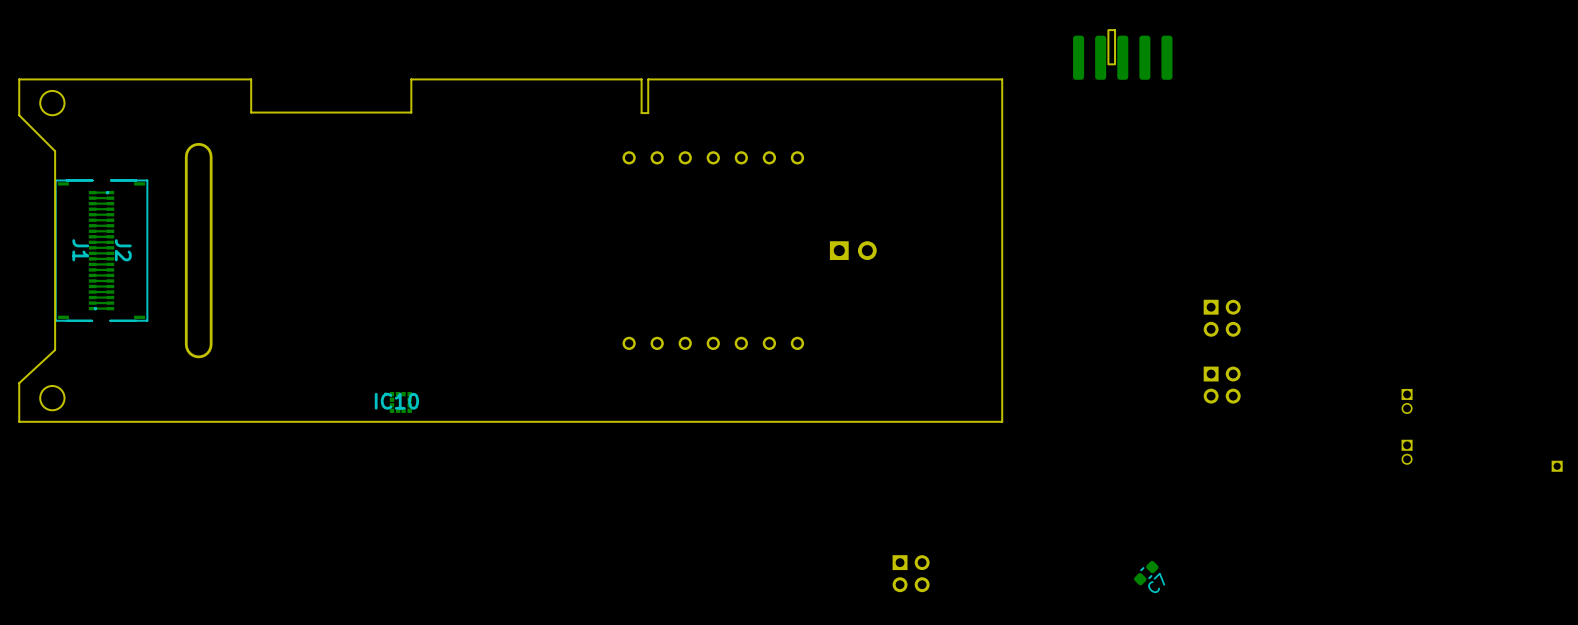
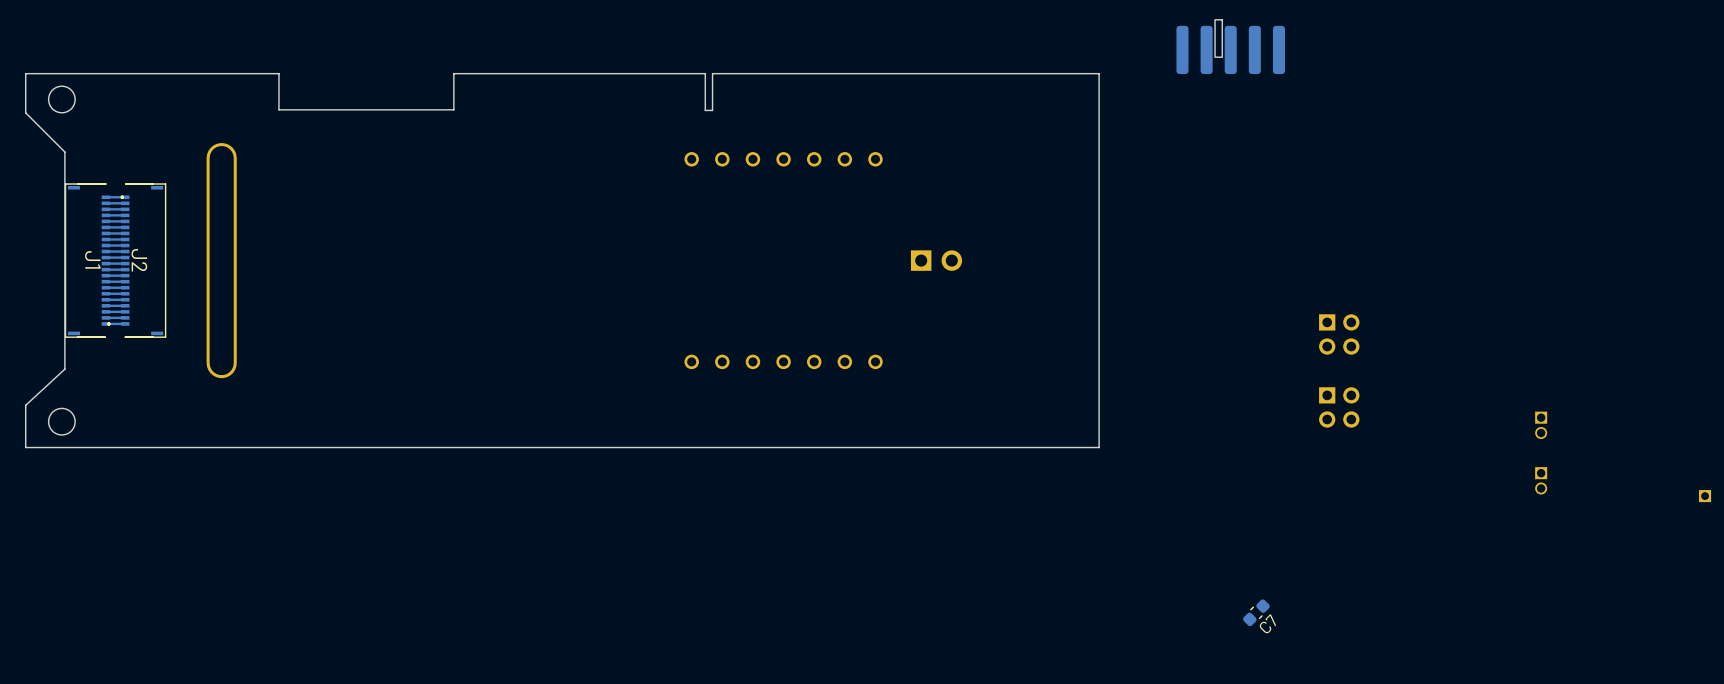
IC10: (397, 402) -> none
part: (911, 573) -> none

